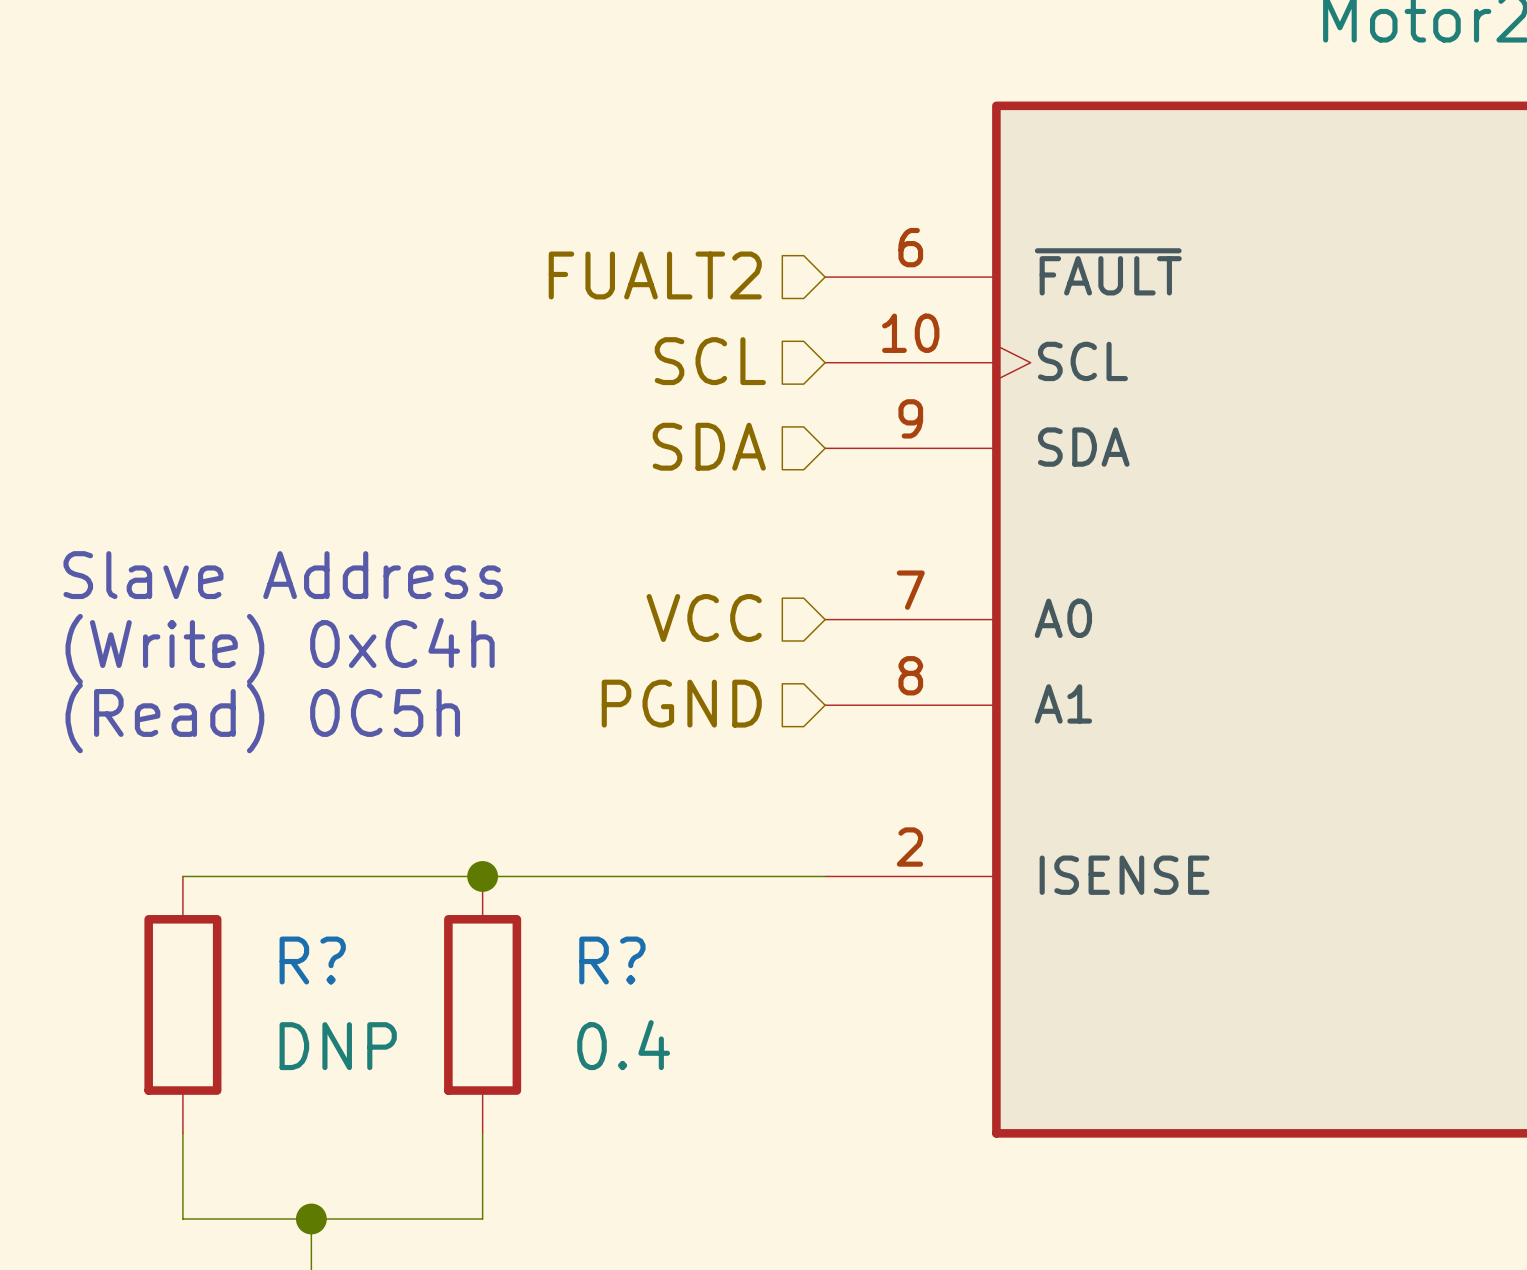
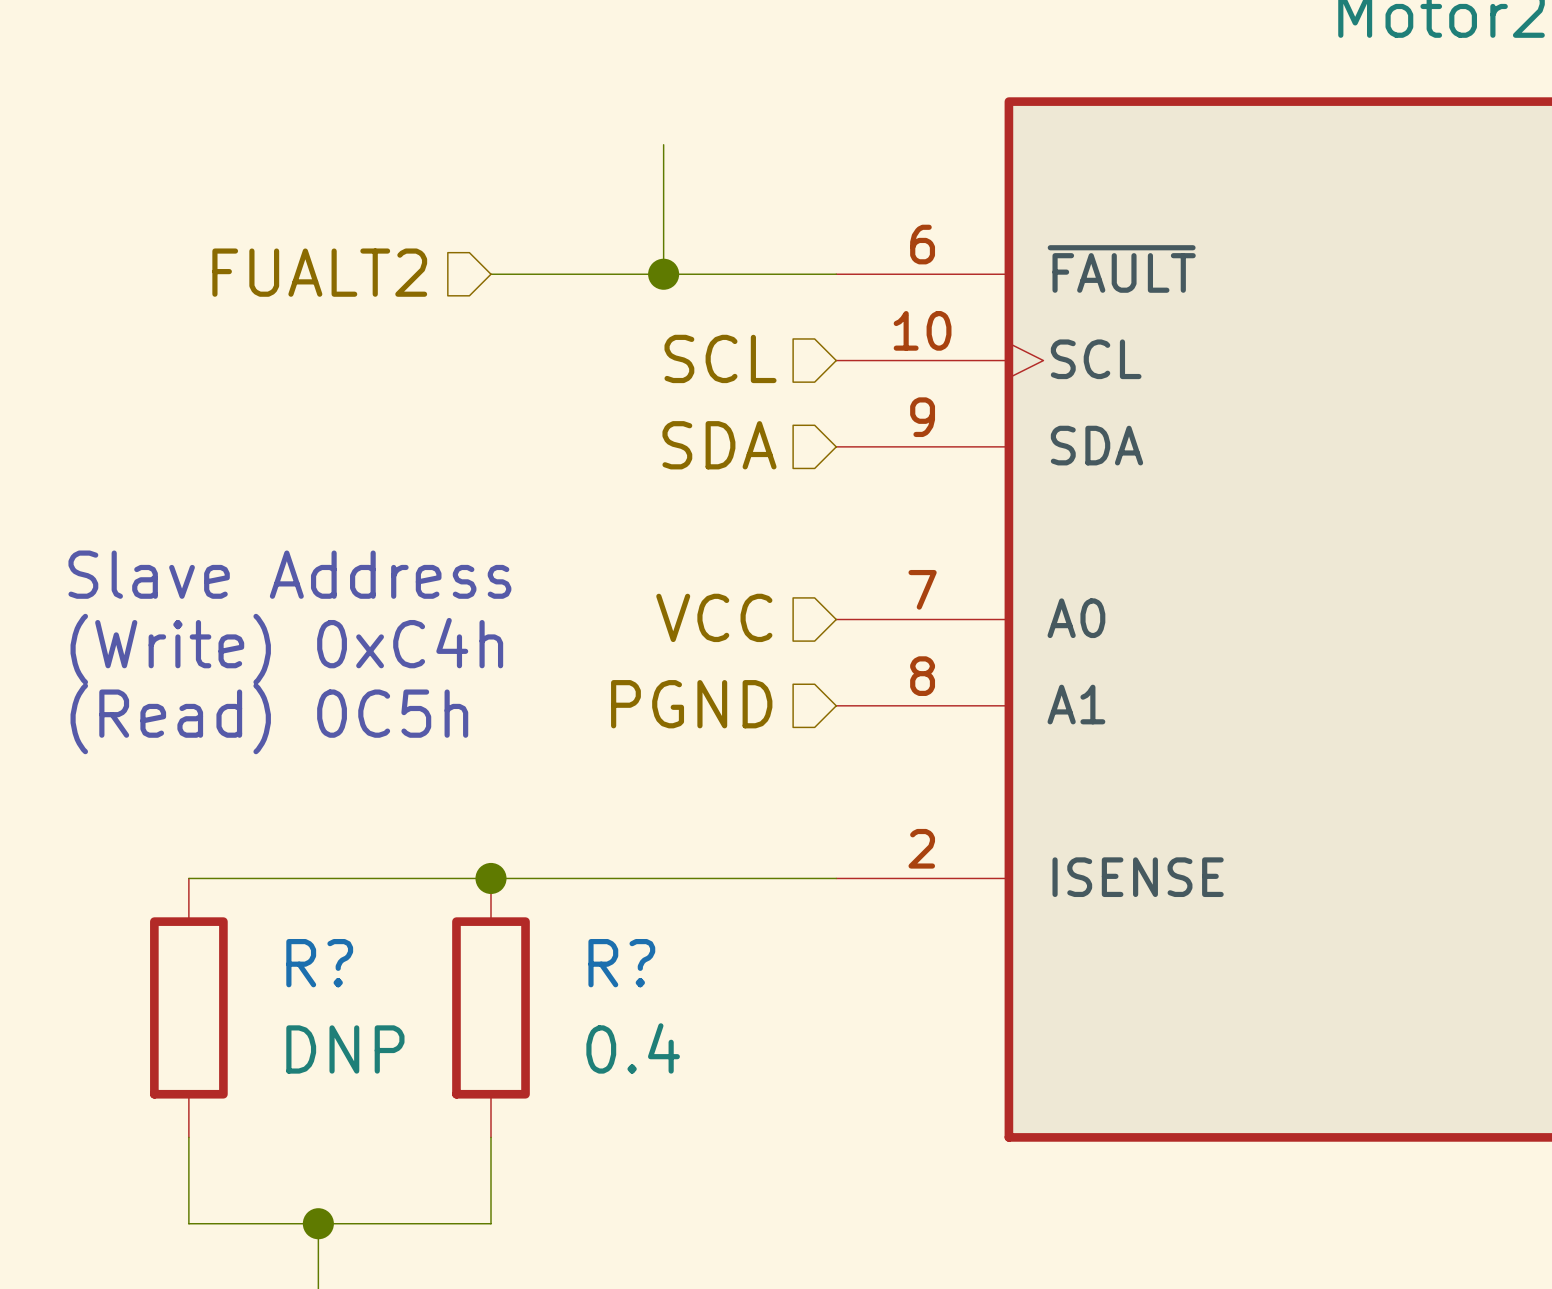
wire: none -> (663, 144) (663, 274)
hierarchical label position: FUALT2 (655, 275) -> FUALT2 (319, 272)
wire: none -> (491, 274) (836, 274)
junction: none -> (663, 274)

